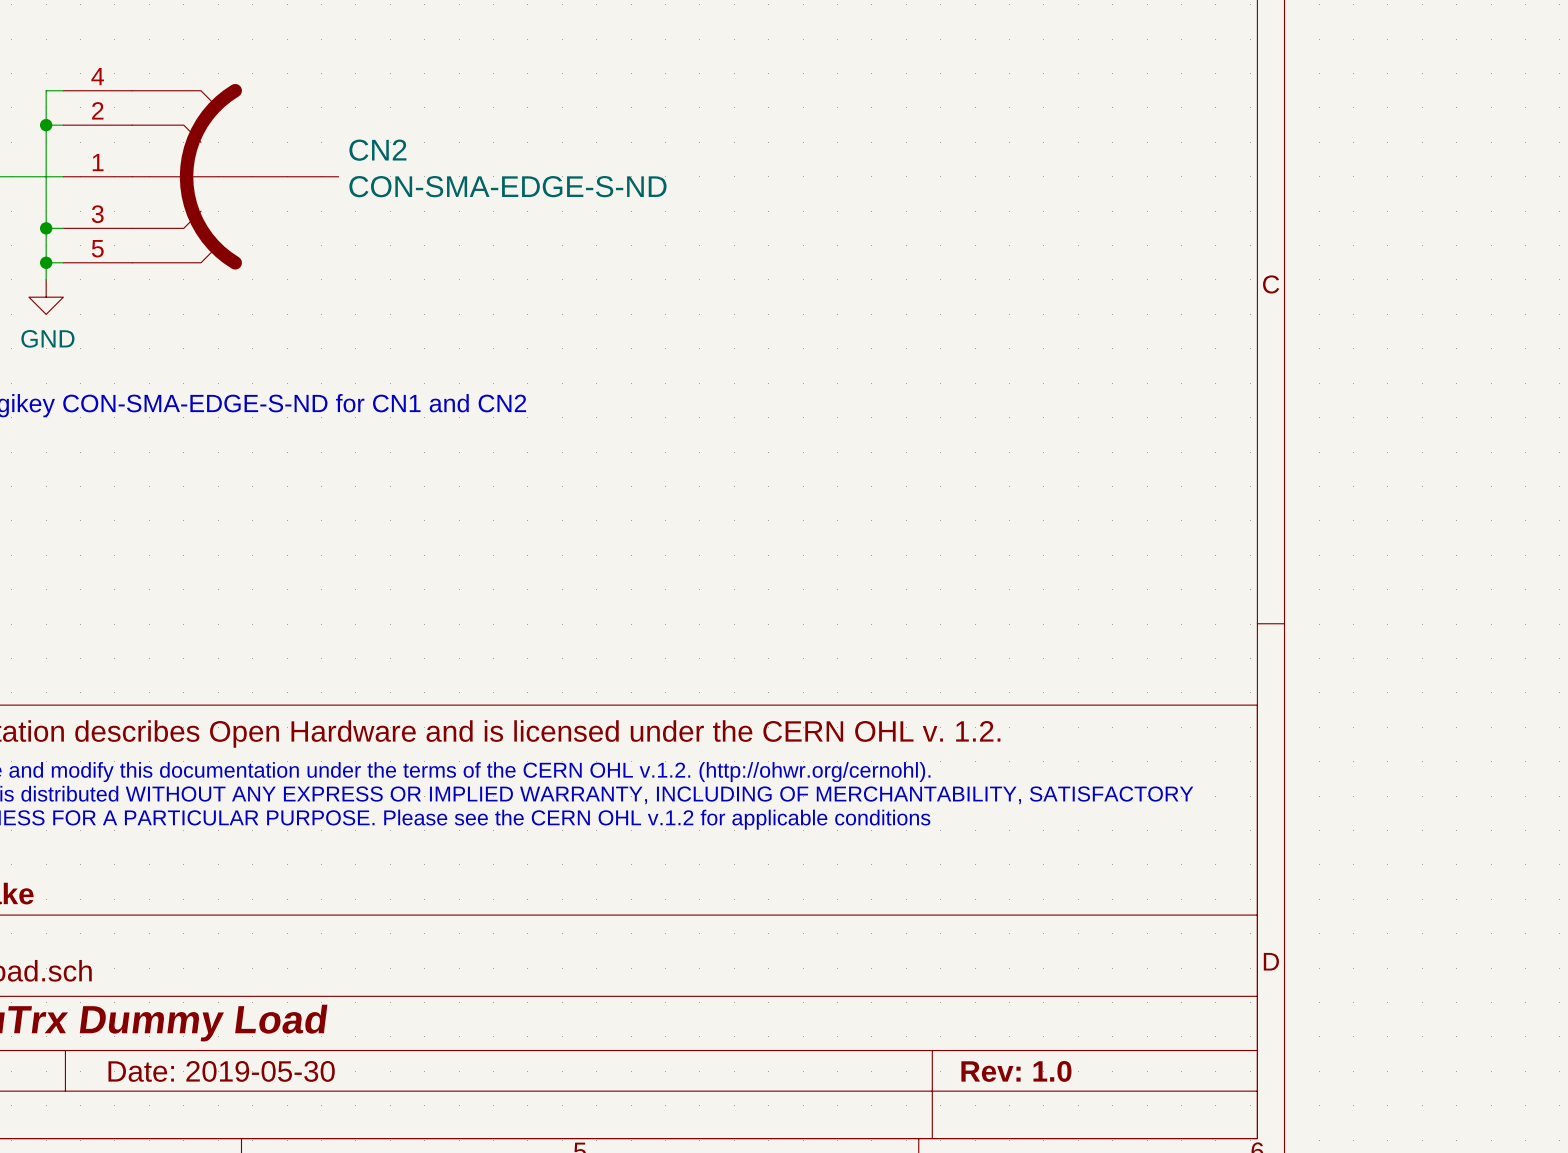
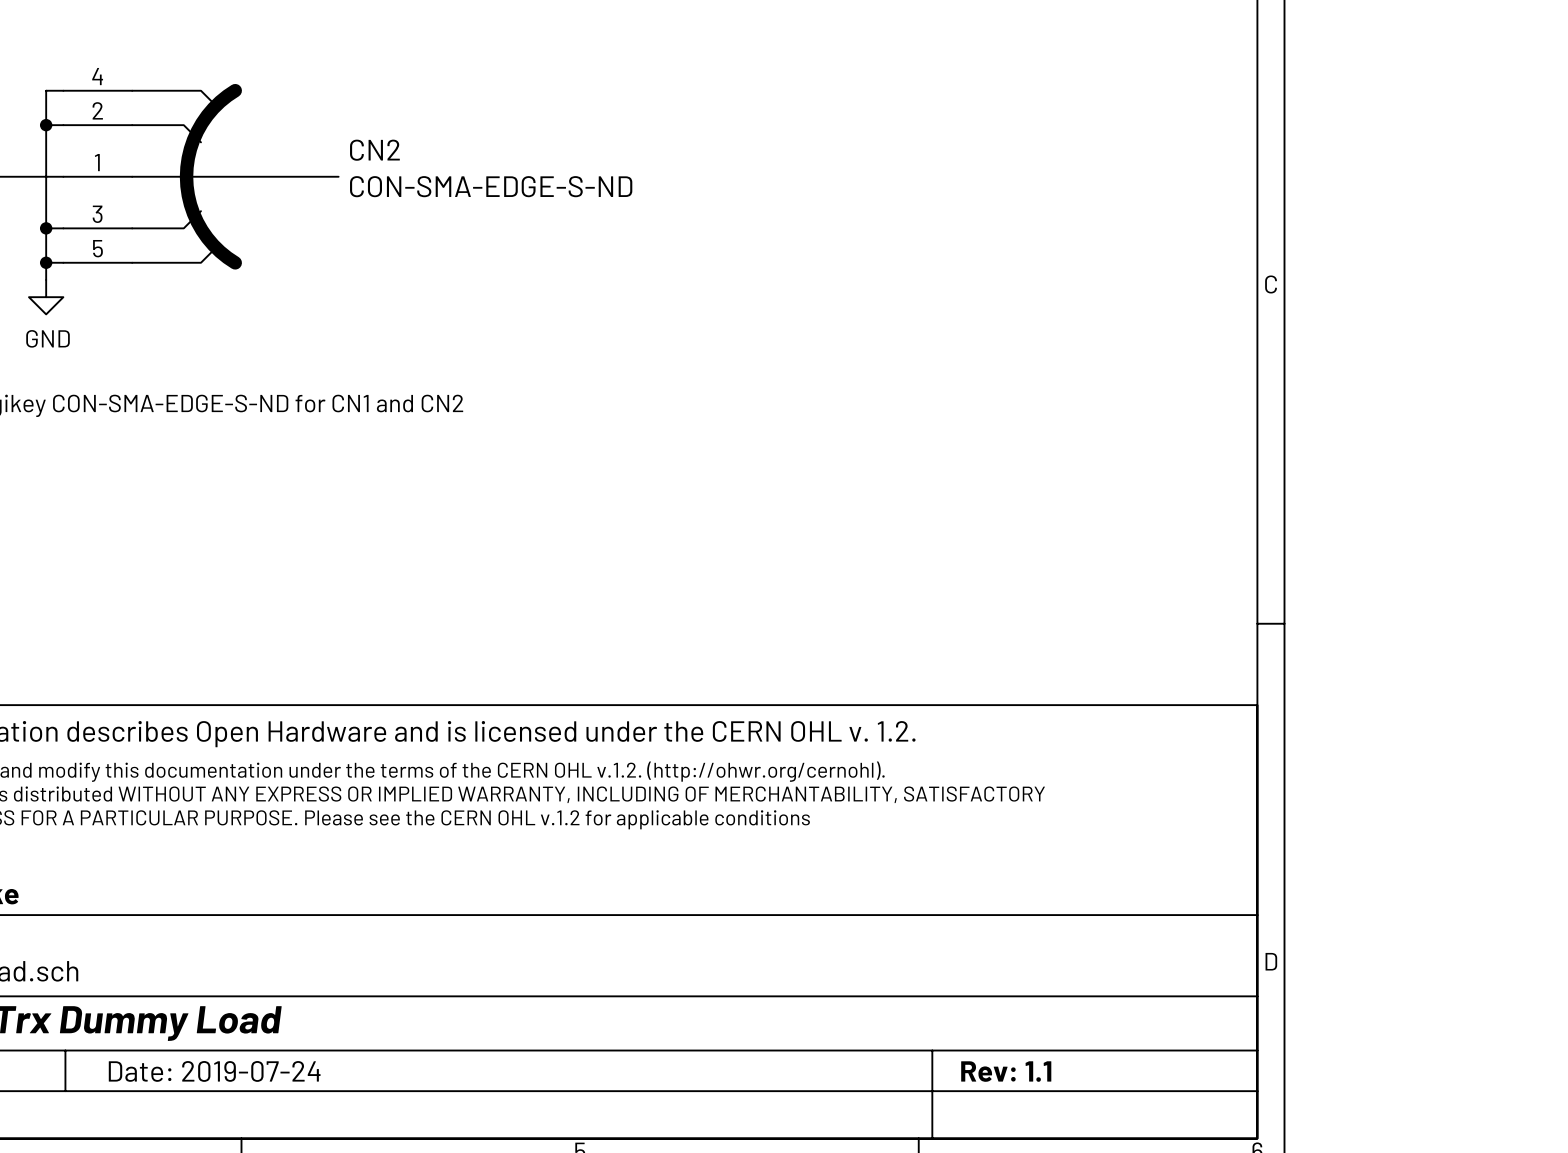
title block: Date: 2019-05-30 (221, 1071) -> Date: 2019-07-24 (214, 1071)
title block: Rev: 1.0 (1016, 1071) -> Rev: 1.1 (1006, 1071)

